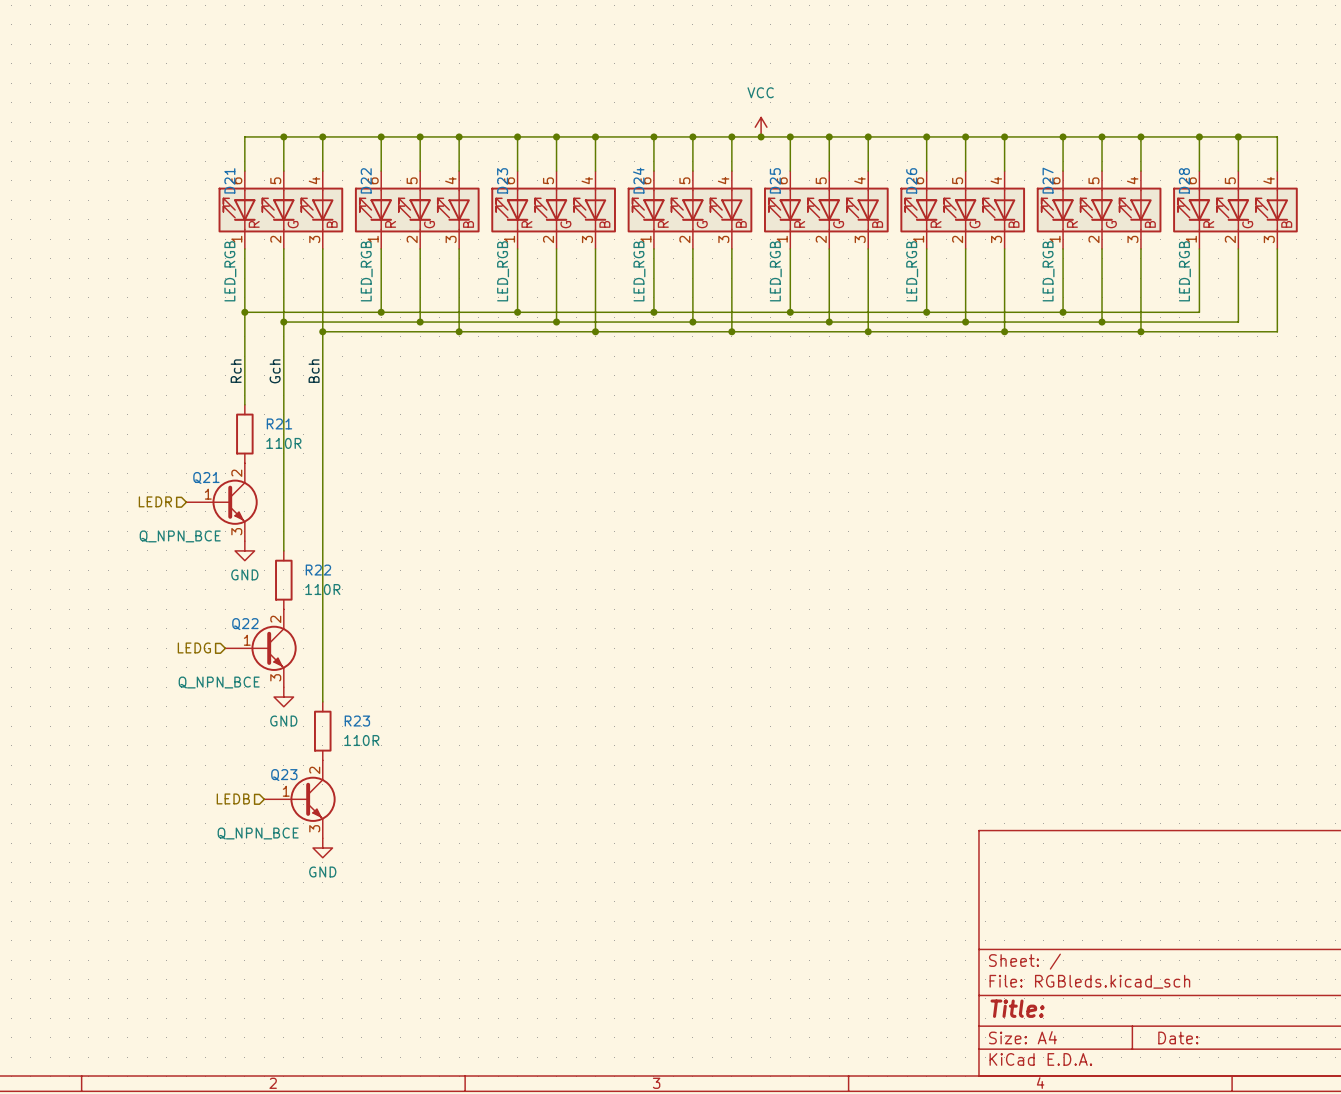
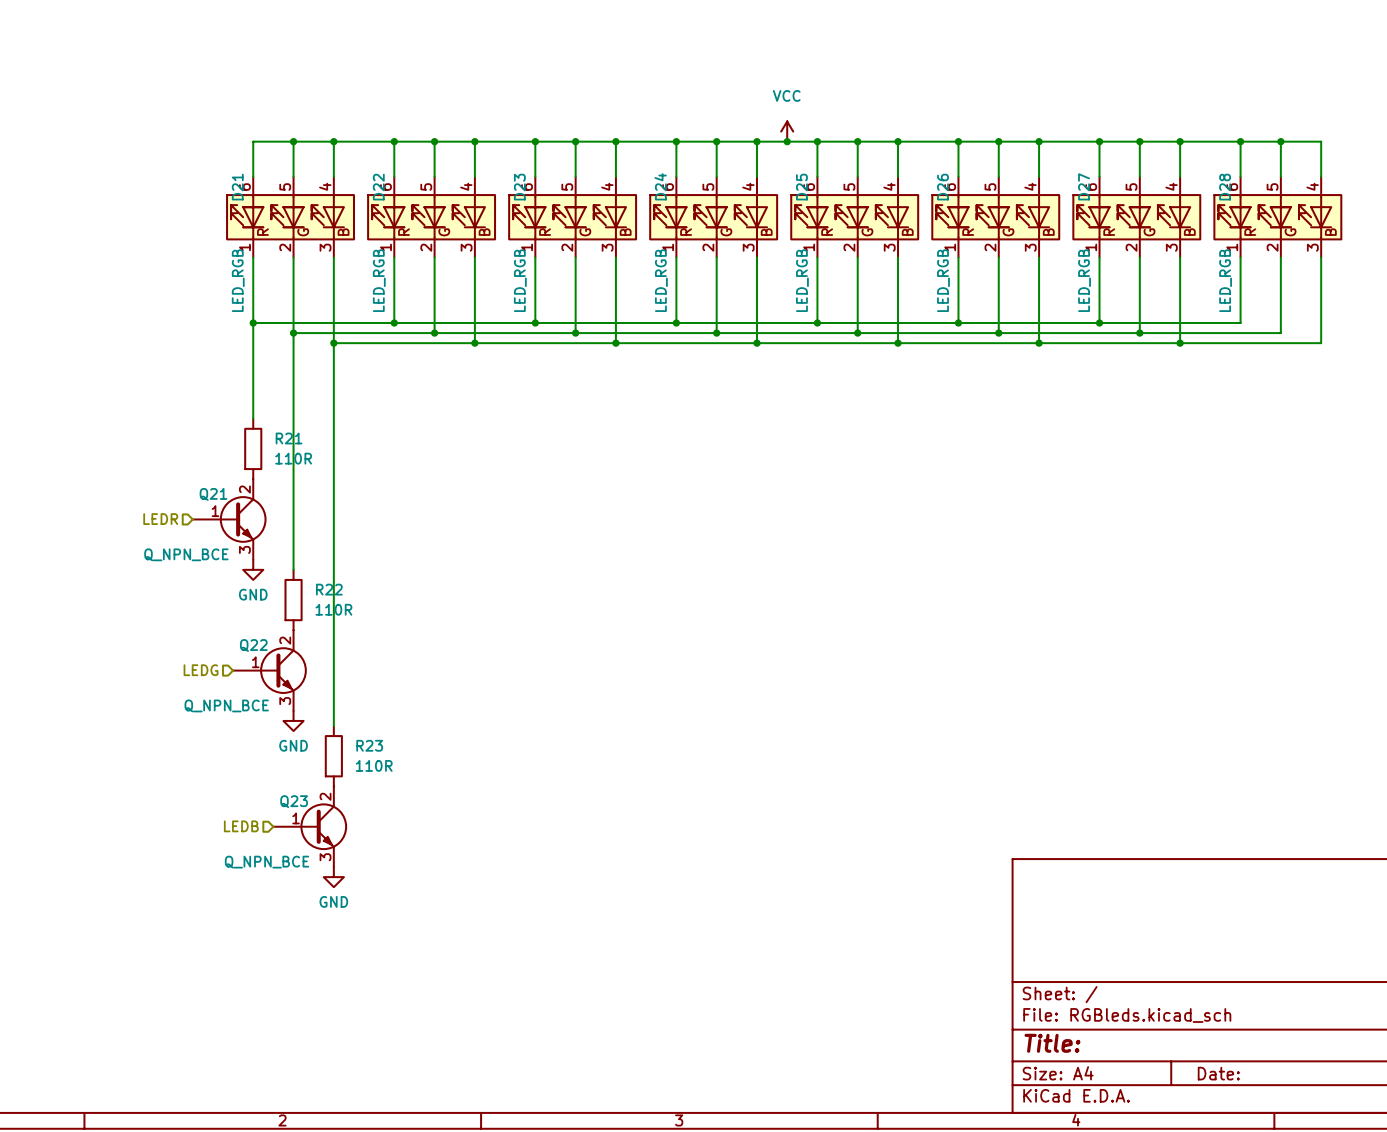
label: Rch (236, 371) -> none
label: Gch (275, 371) -> none
label: Bch (314, 371) -> none

